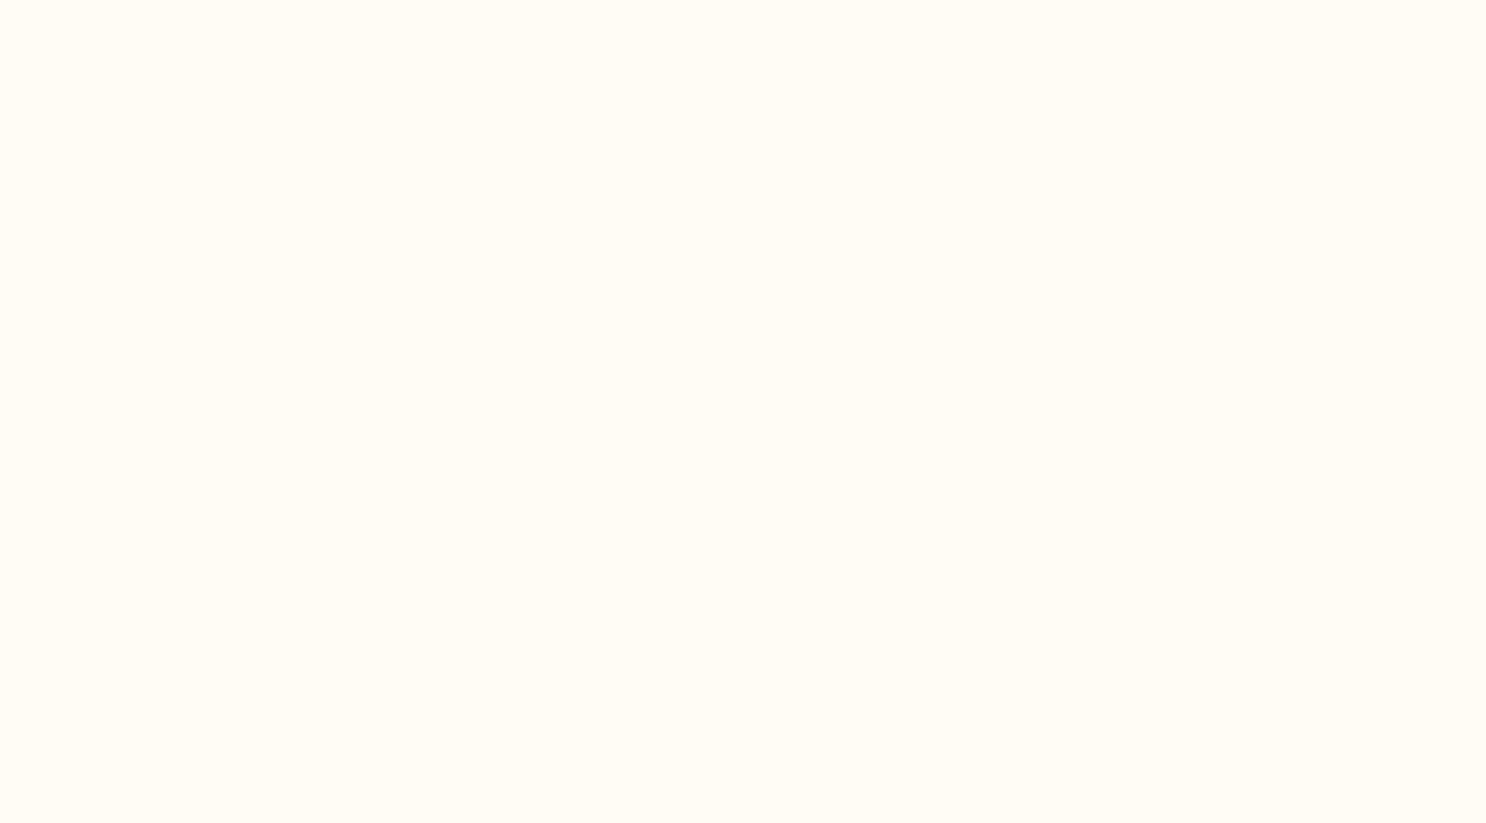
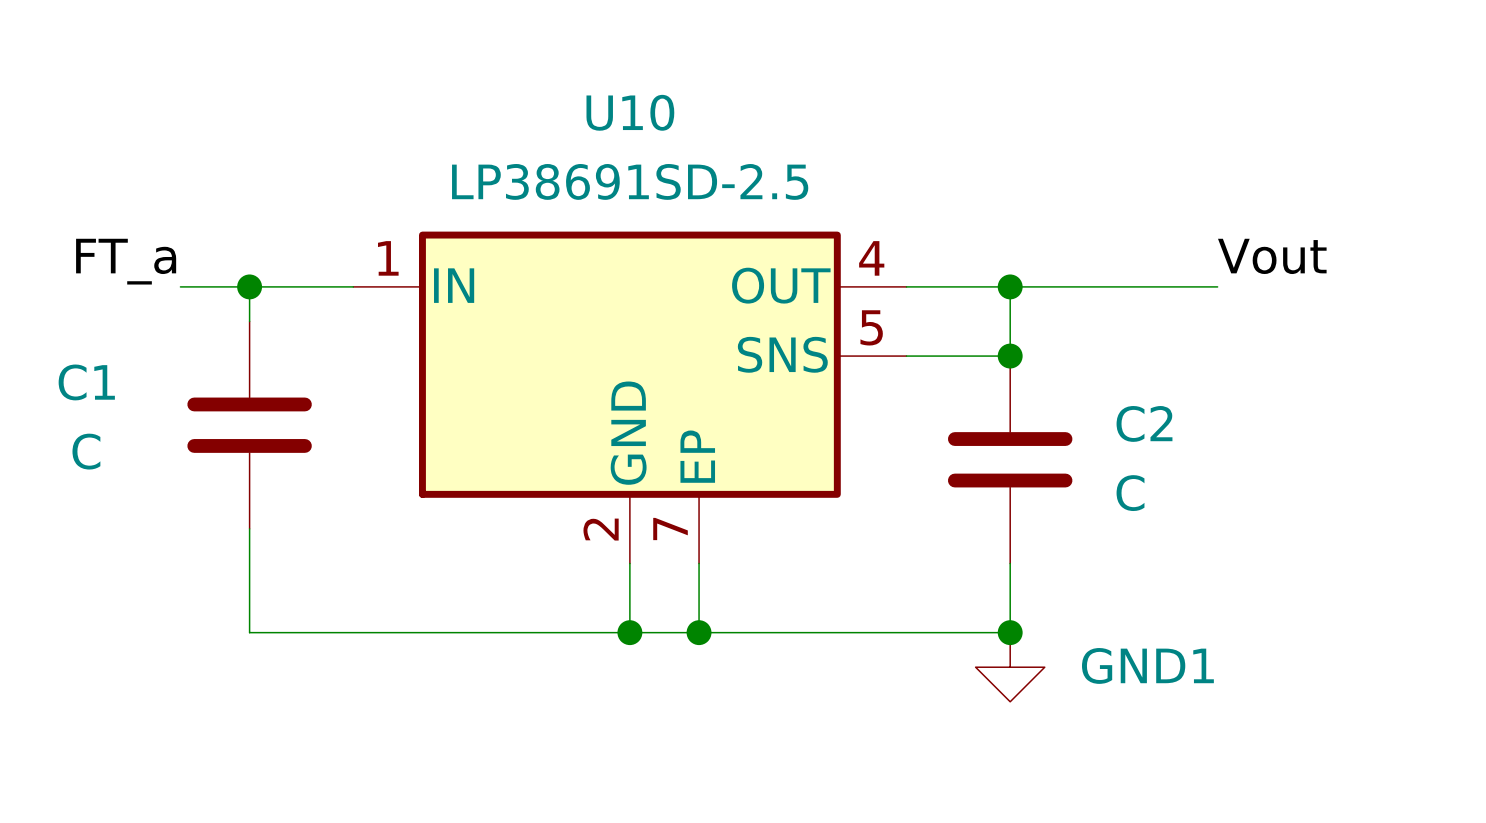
label: none -> FT_a (126, 261)
label: none -> Vout (1272, 256)
wire: none -> (180, 286) (353, 286)
wire: none -> (249, 286) (249, 321)
junction: none -> (249, 286)
wire: none -> (906, 286) (1217, 286)
wire: none -> (1010, 286) (1010, 356) (906, 356)
junction: none -> (1010, 286)
junction: none -> (1010, 356)
U10: none -> LP38691SD-2.5 (629, 397)
C1: none -> C (249, 425)
C2: none -> C (1010, 459)
wire: none -> (249, 528) (249, 632) (1010, 632) (1010, 563)
wire: none -> (629, 563) (629, 632)
wire: none -> (699, 563) (699, 632)
junction: none -> (629, 632)
junction: none -> (699, 632)
junction: none -> (1010, 632)
power symbol: none -> GND1 (1010, 667)

